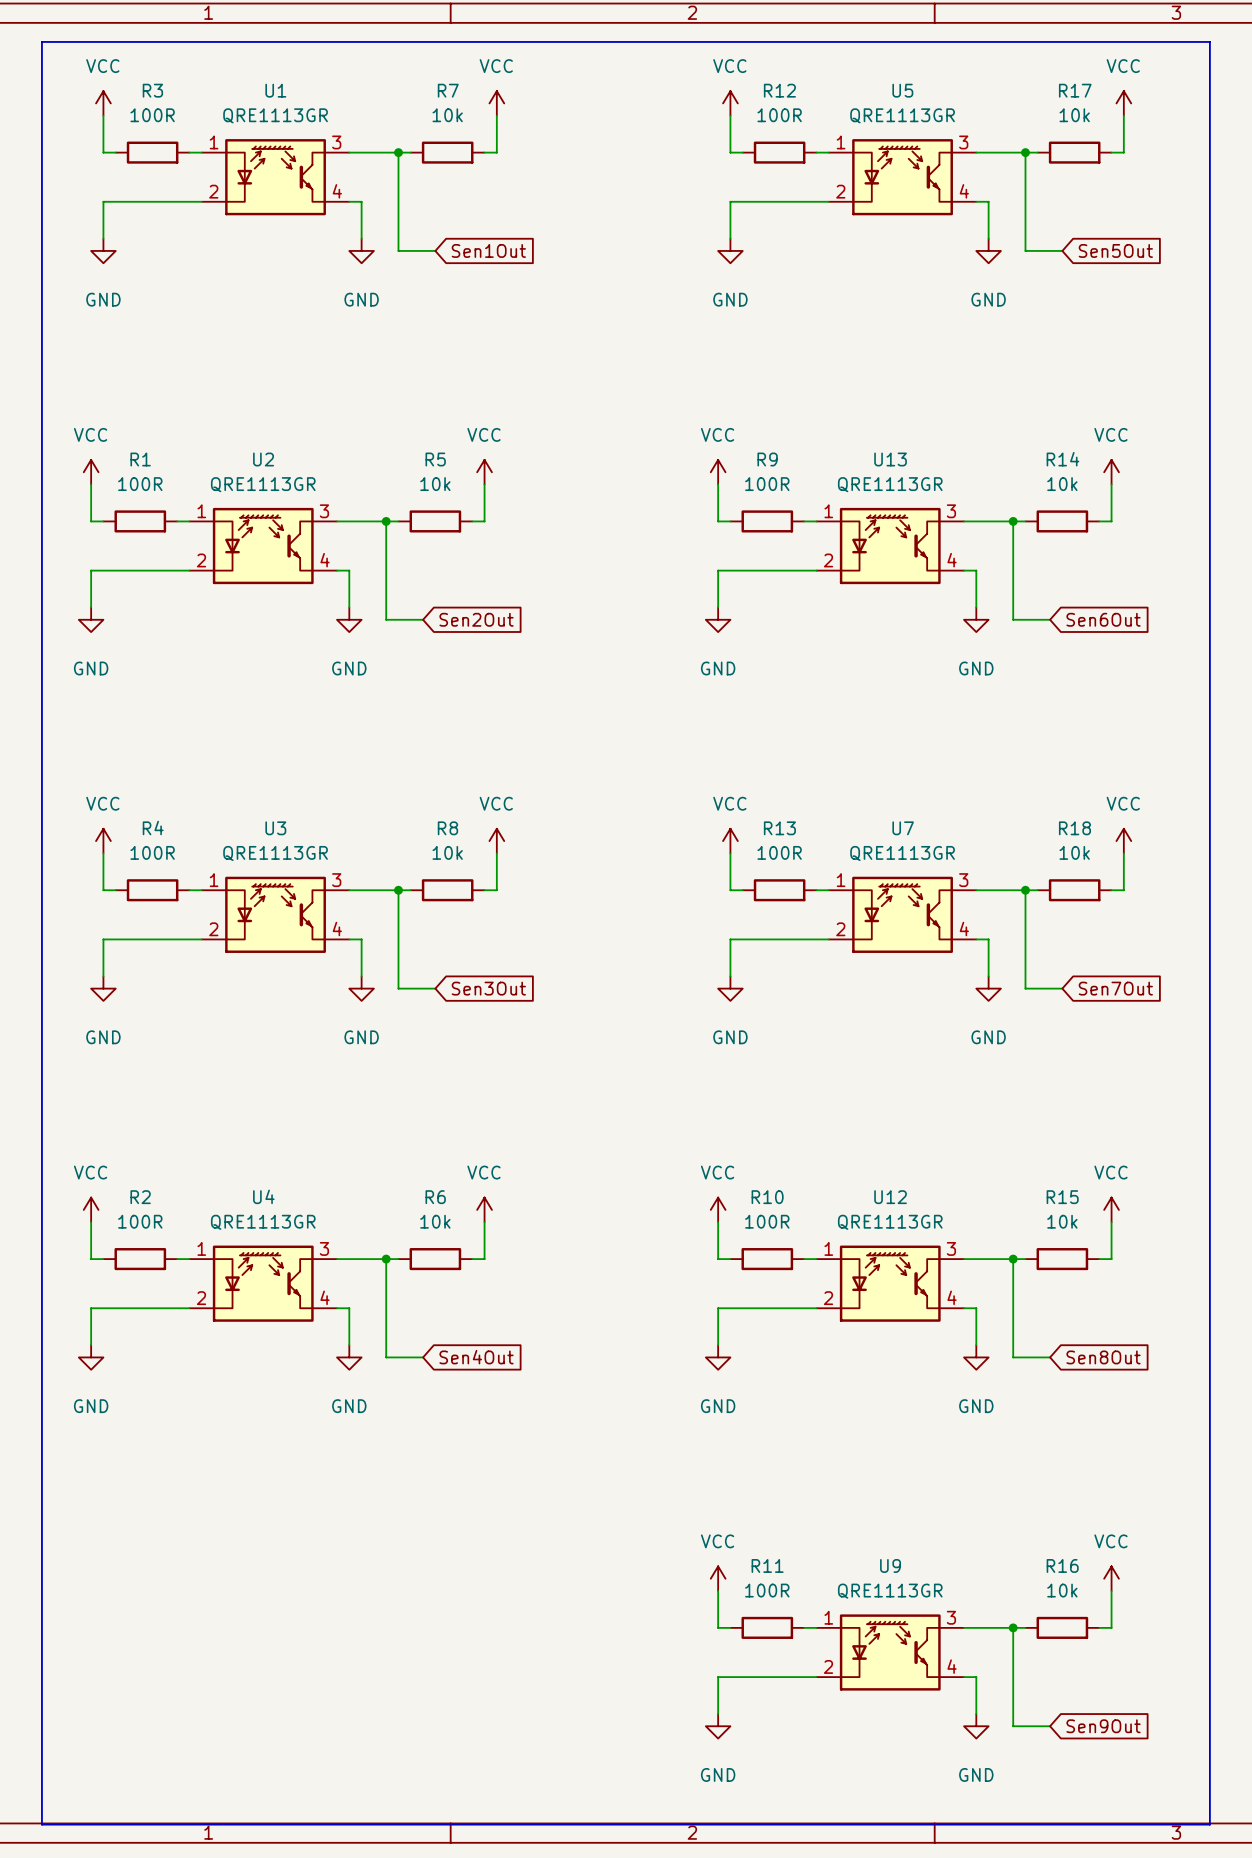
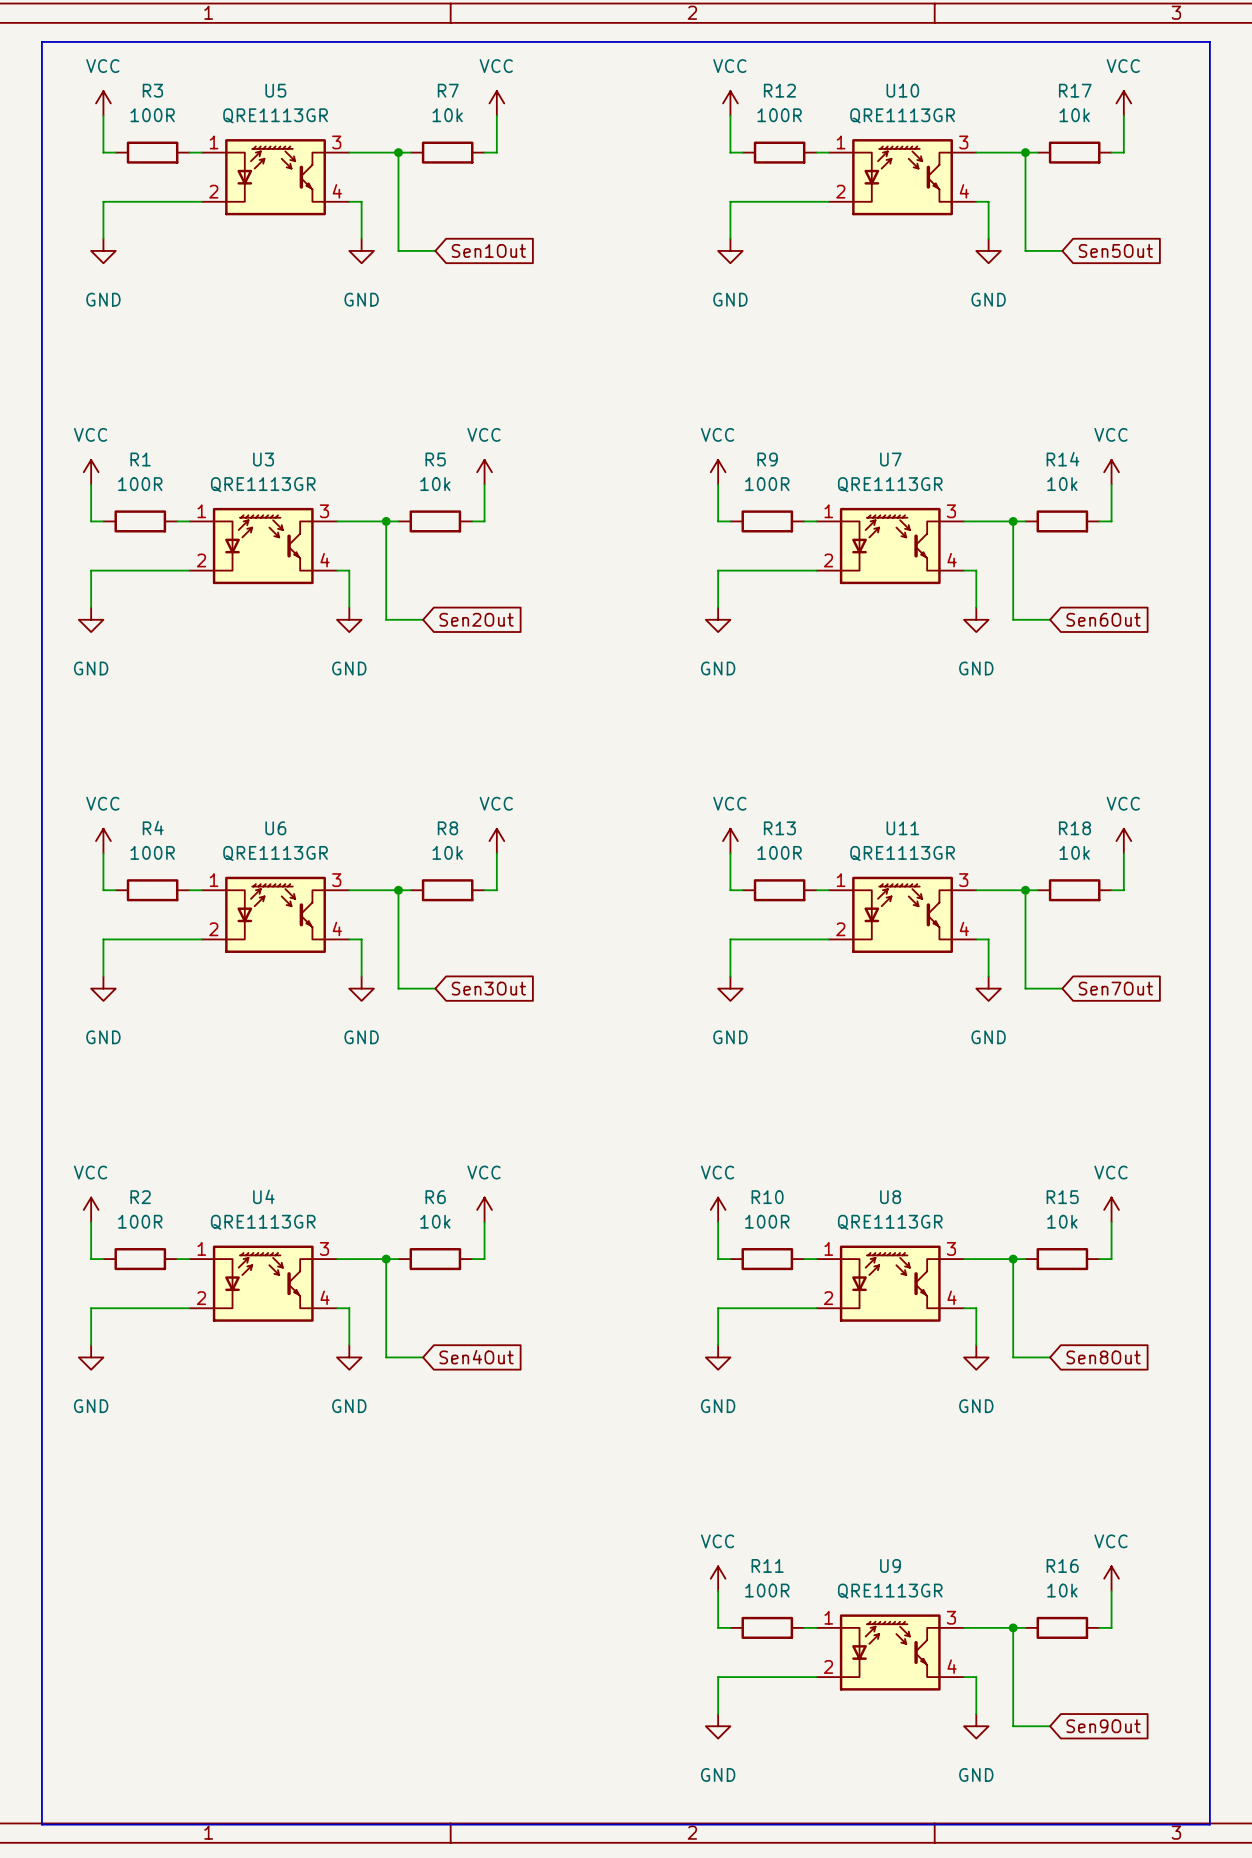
U1 name: U1 (275, 90) -> U5 (275, 90)
U5 name: U5 (902, 90) -> U10 (902, 90)
U2 name: U2 (263, 459) -> U3 (263, 459)
U13 name: U13 (890, 459) -> U7 (890, 459)
U3 name: U3 (275, 828) -> U6 (275, 828)
U7 name: U7 (903, 828) -> U11 (902, 828)
U12 name: U12 (890, 1197) -> U8 (890, 1197)

